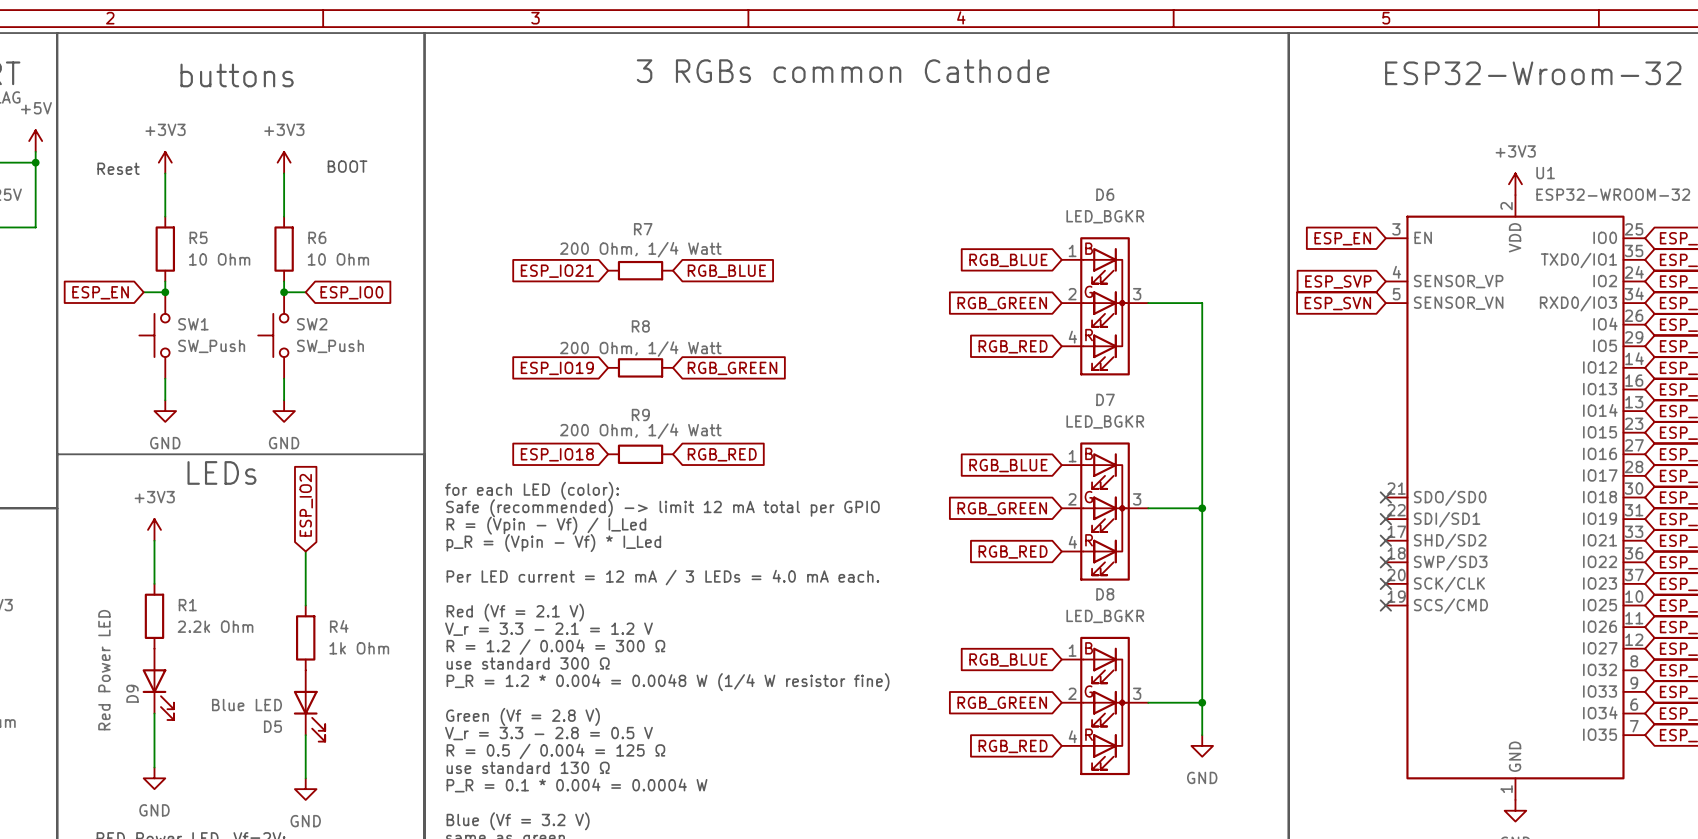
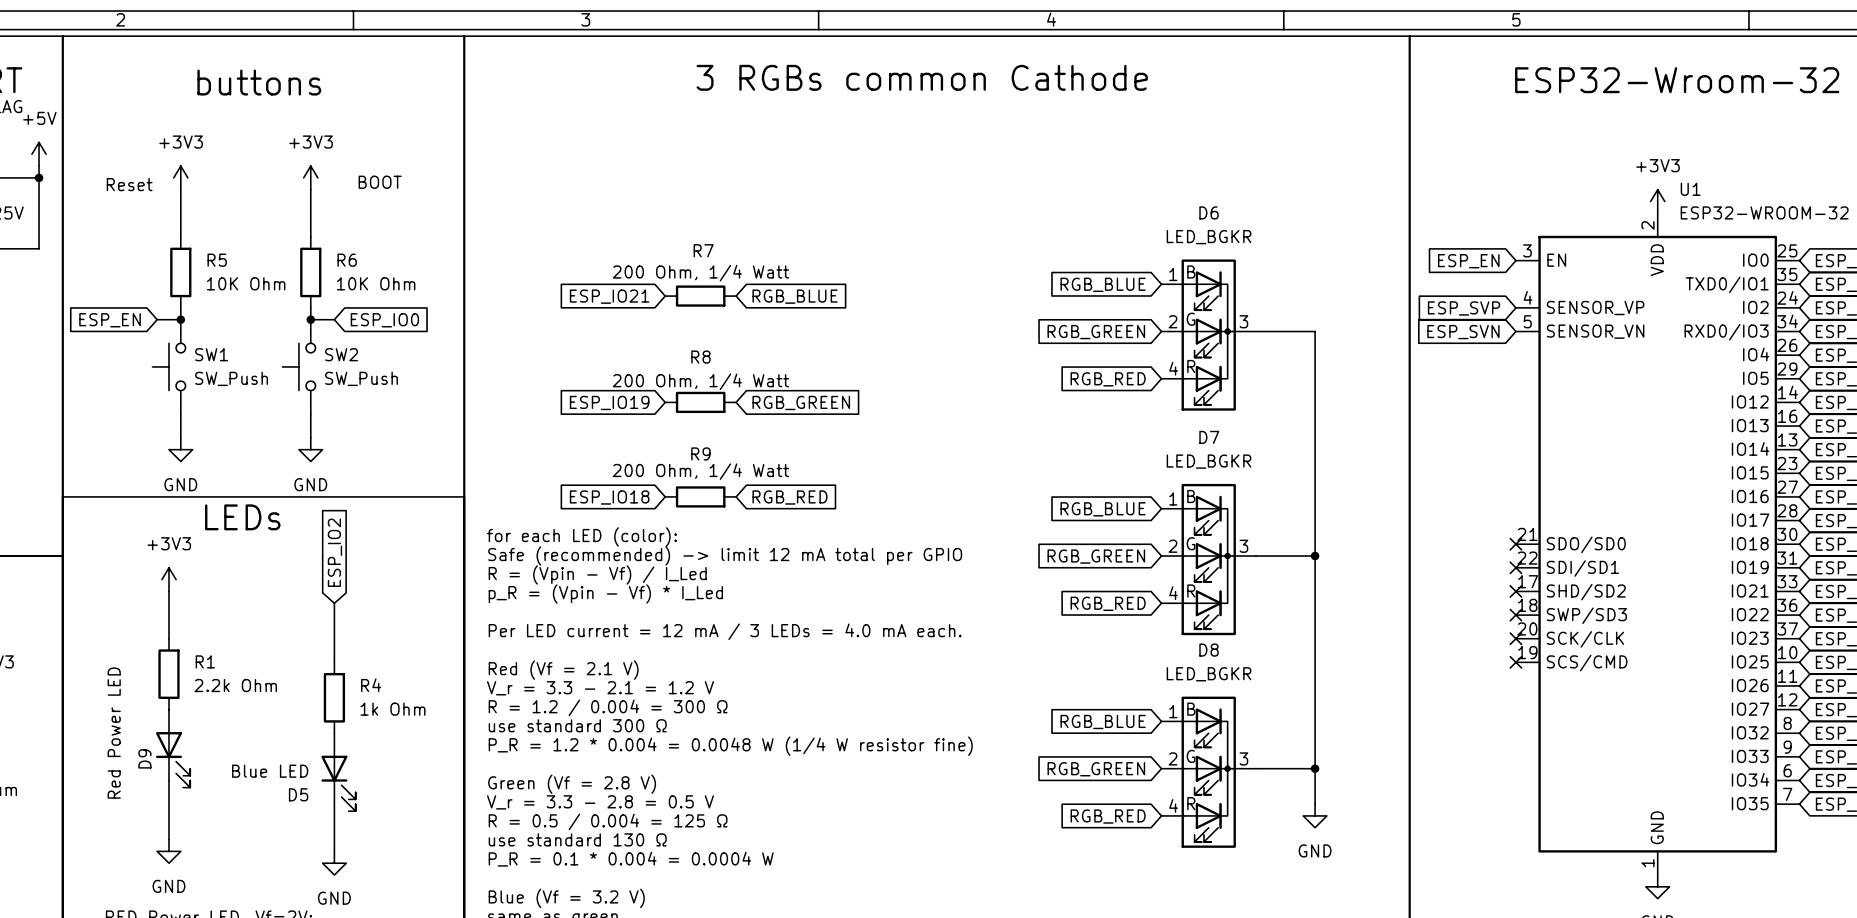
R5 value: 10 Ohm (219, 259) -> 10K Ohm (246, 283)
R6 value: 10 Ohm (338, 259) -> 10K Ohm (376, 283)

